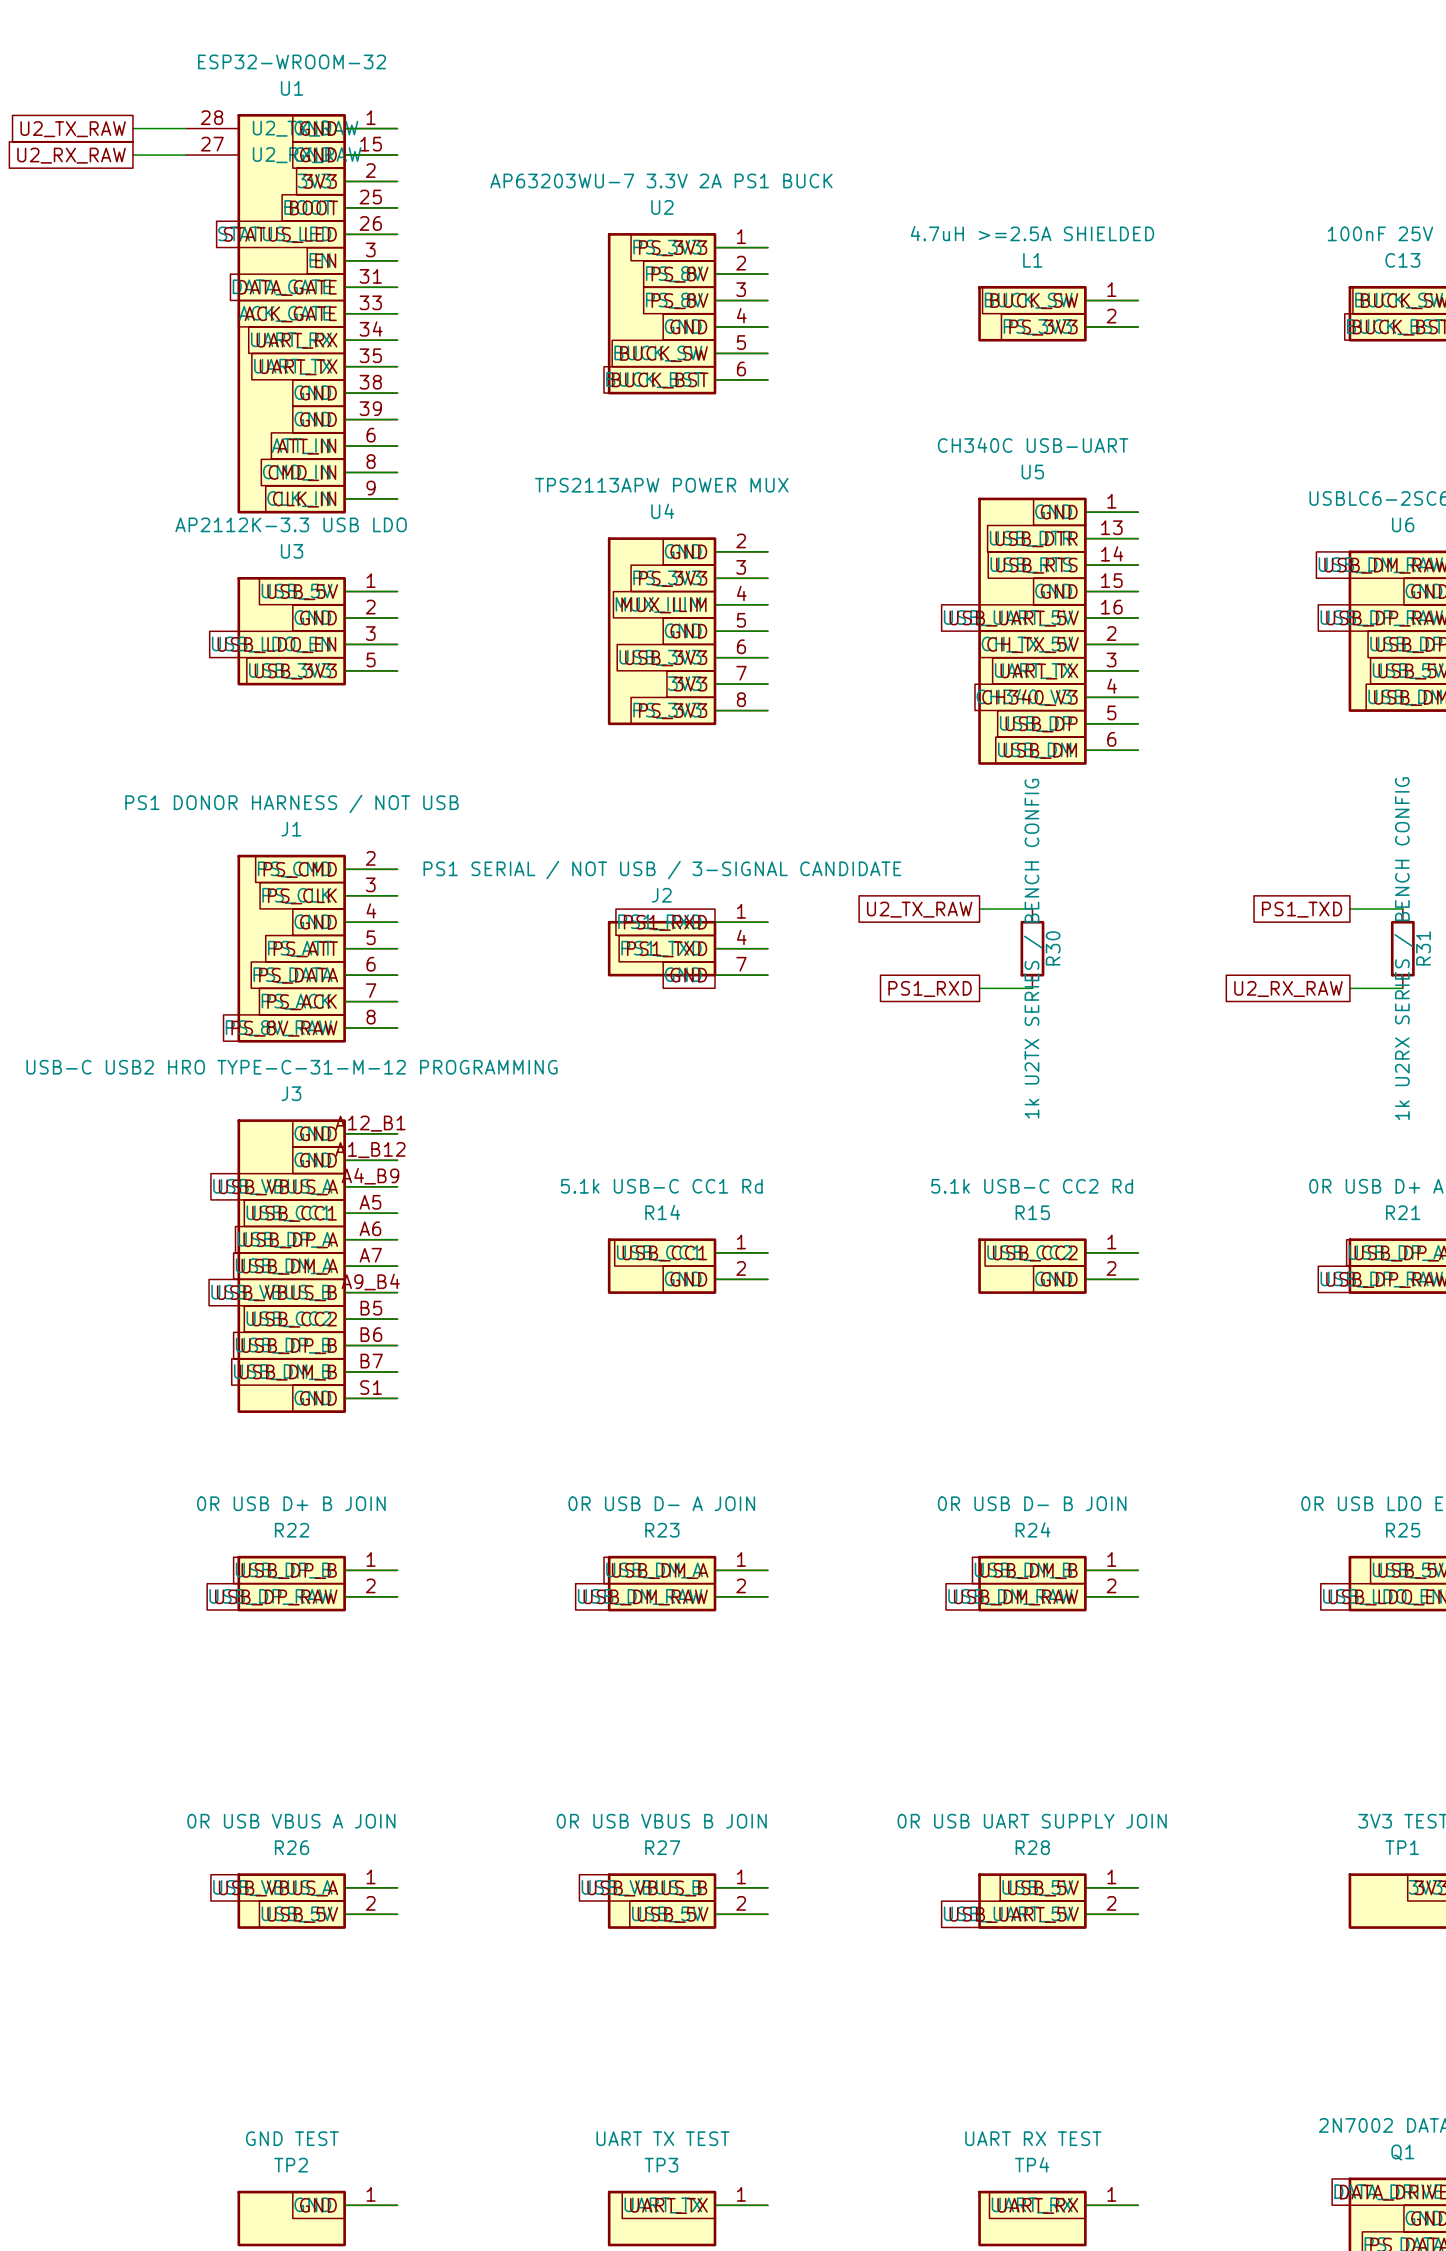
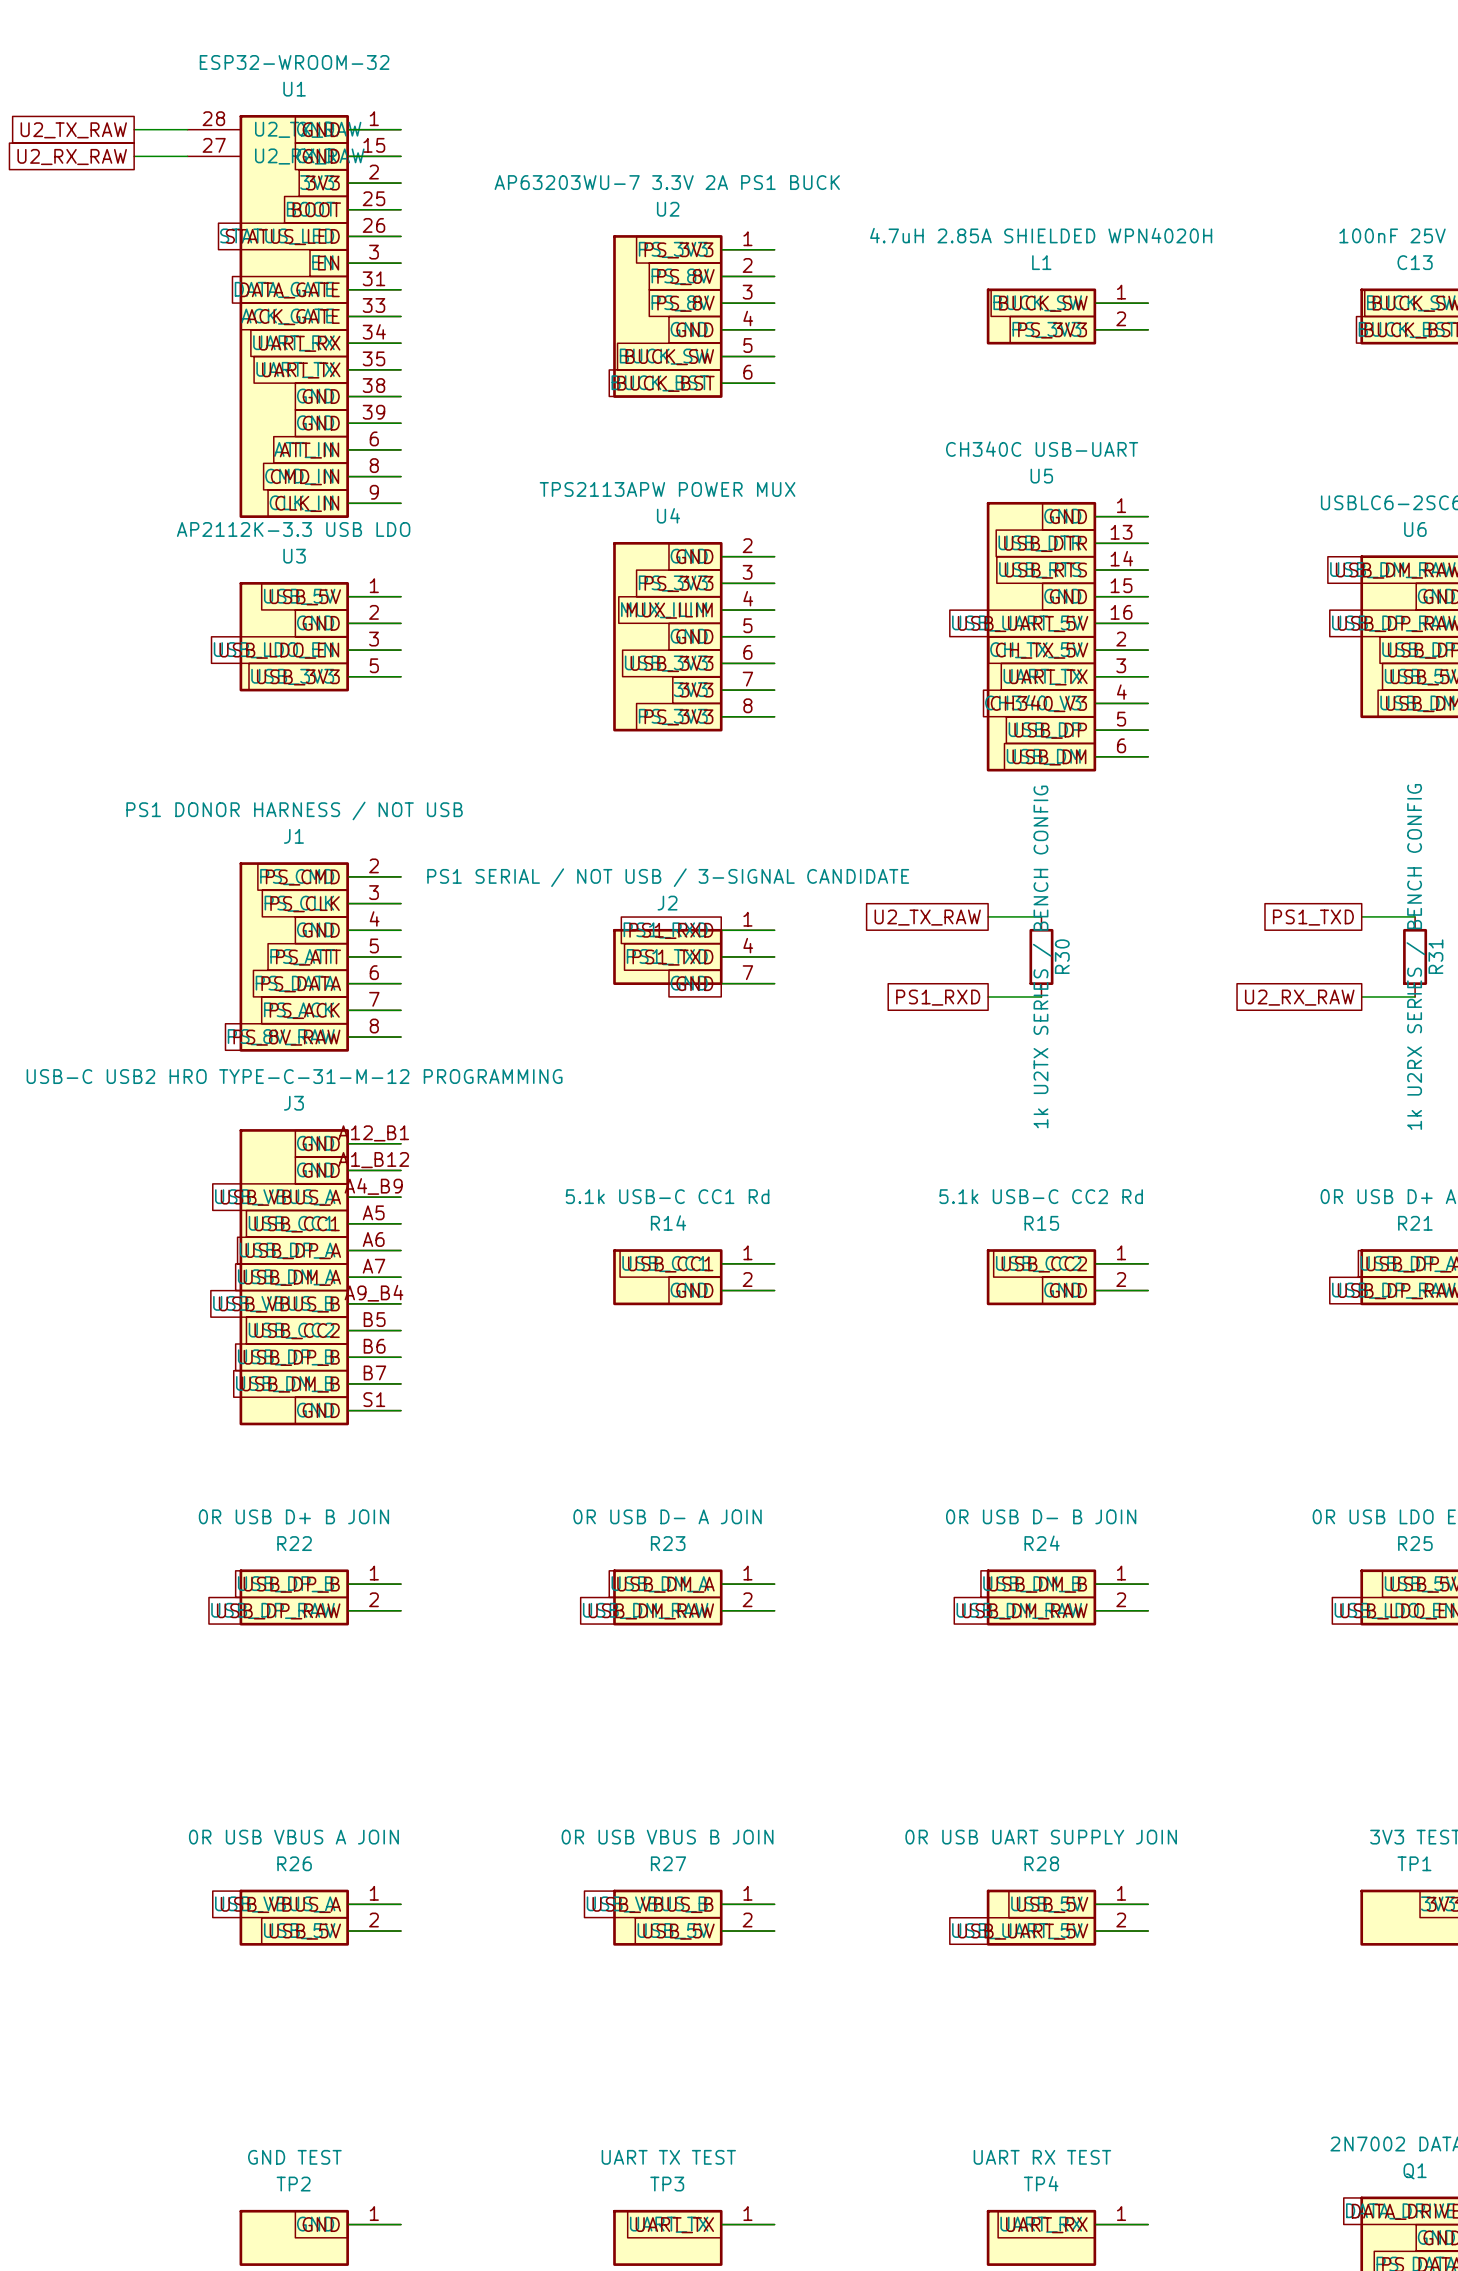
L1 value: 4.7uH >=2.5A SHIELDED (1032, 233) -> 4.7uH 2.85A SHIELDED WPN4020H (1041, 235)

